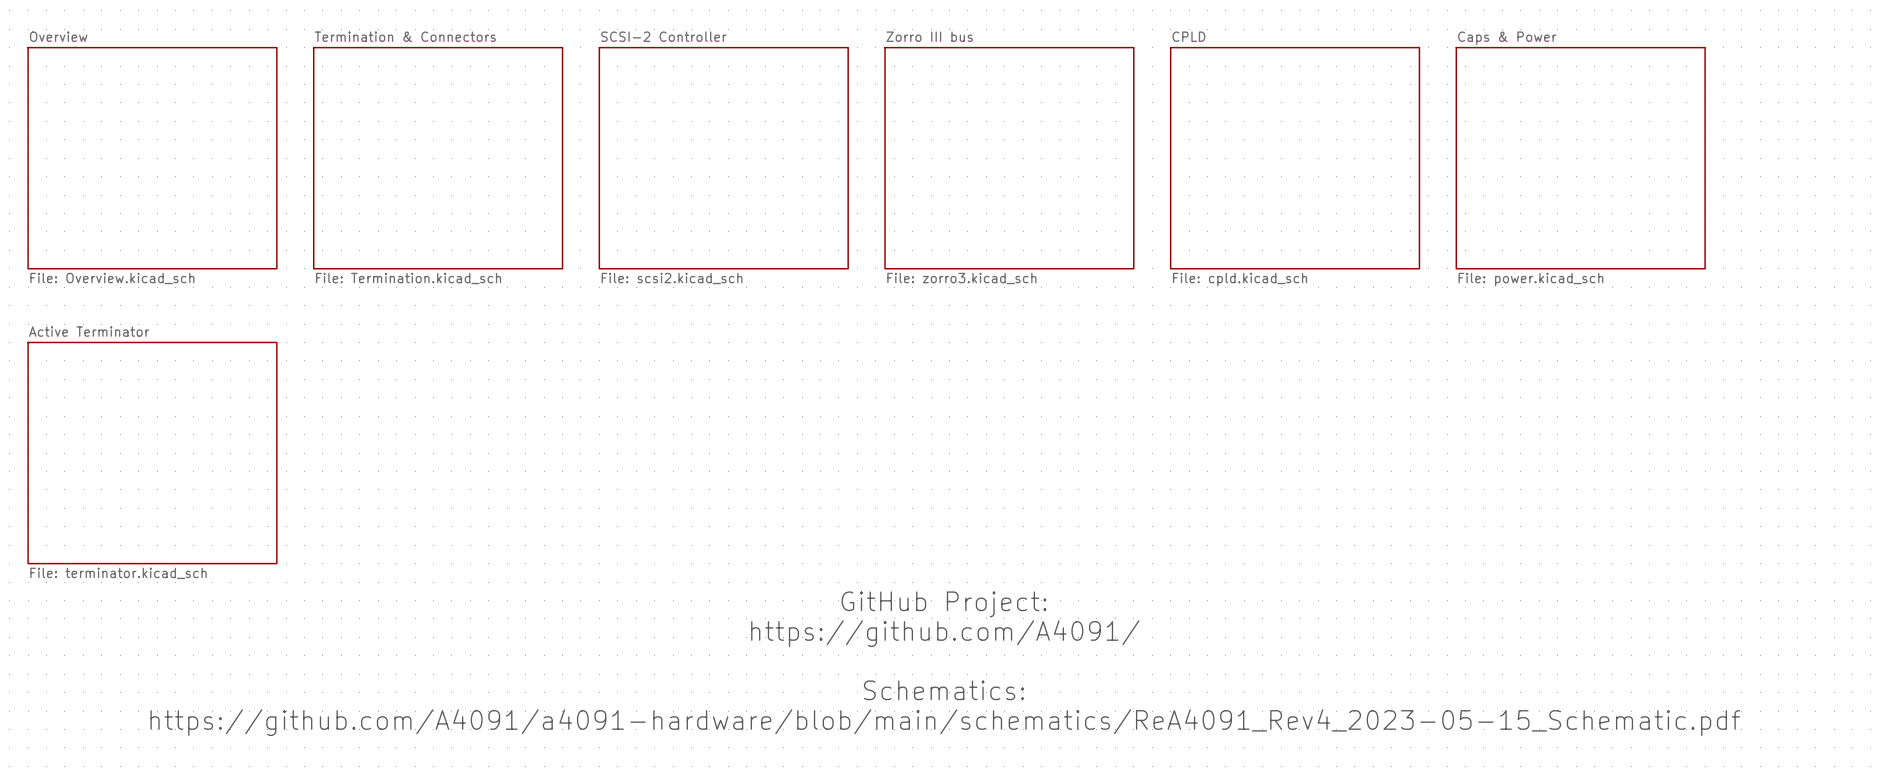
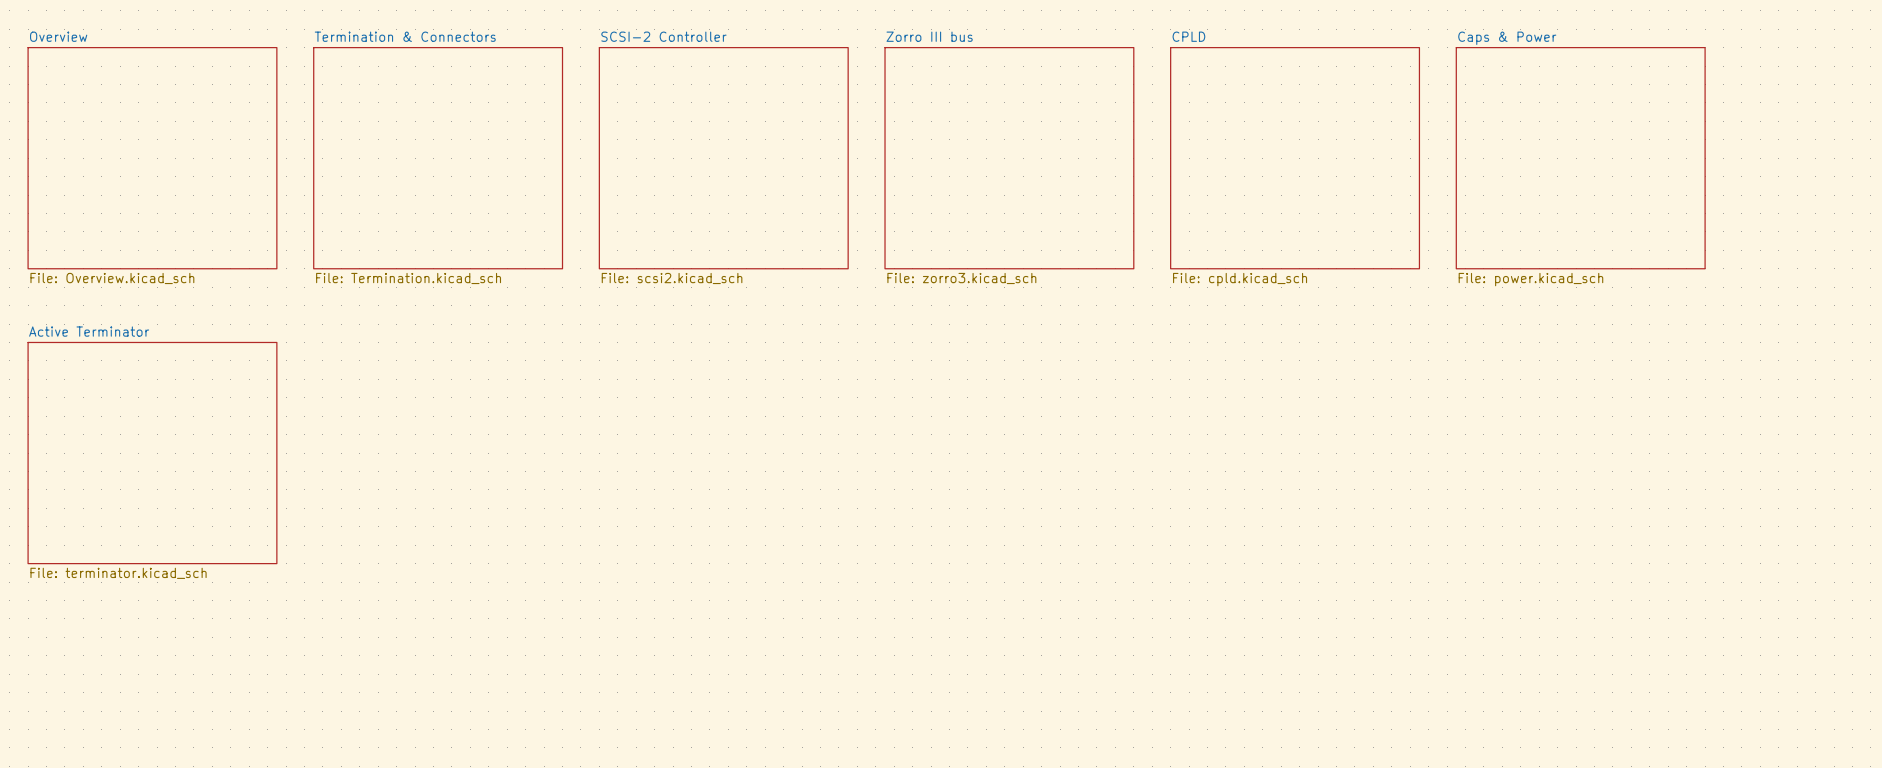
text: GitHub Project: (943, 604) -> none
text: https://github.com/A4091/ (945, 633) -> none
text: Schematics: (943, 690) -> none
text: https://github.com/A4091/a4091-hardware/blob/main/schematics/ReA4091_Rev4_2023-05-15_Schematic.pdf (945, 722) -> none

